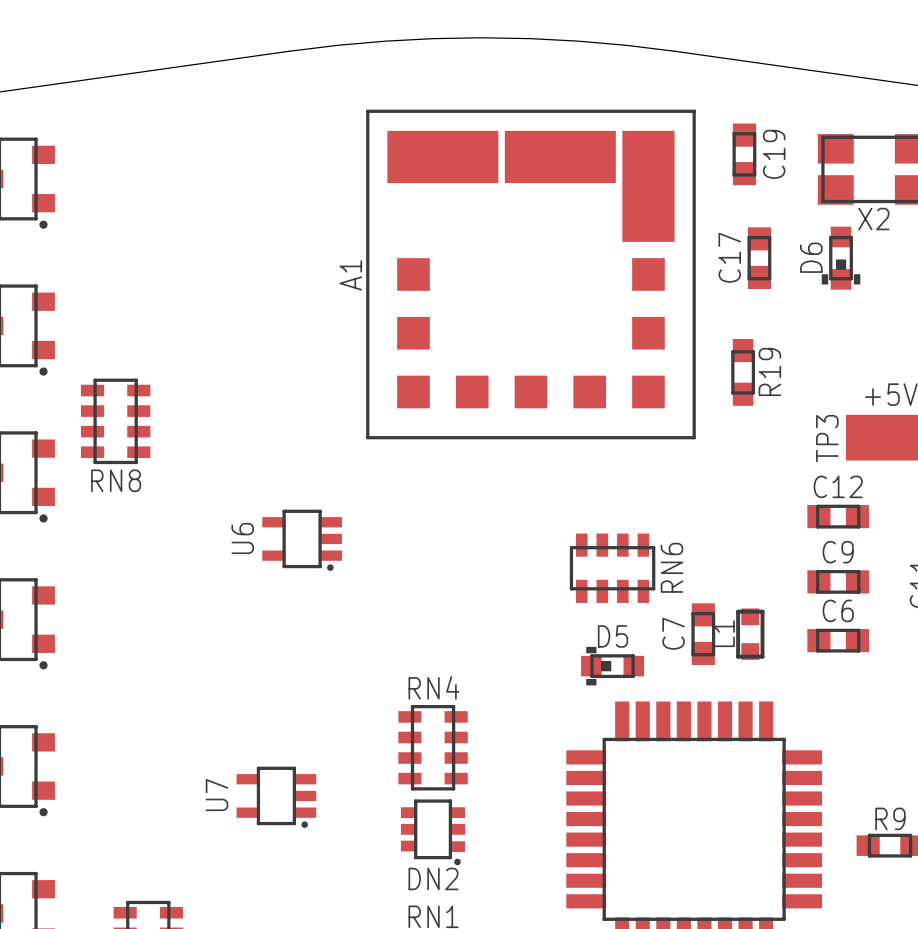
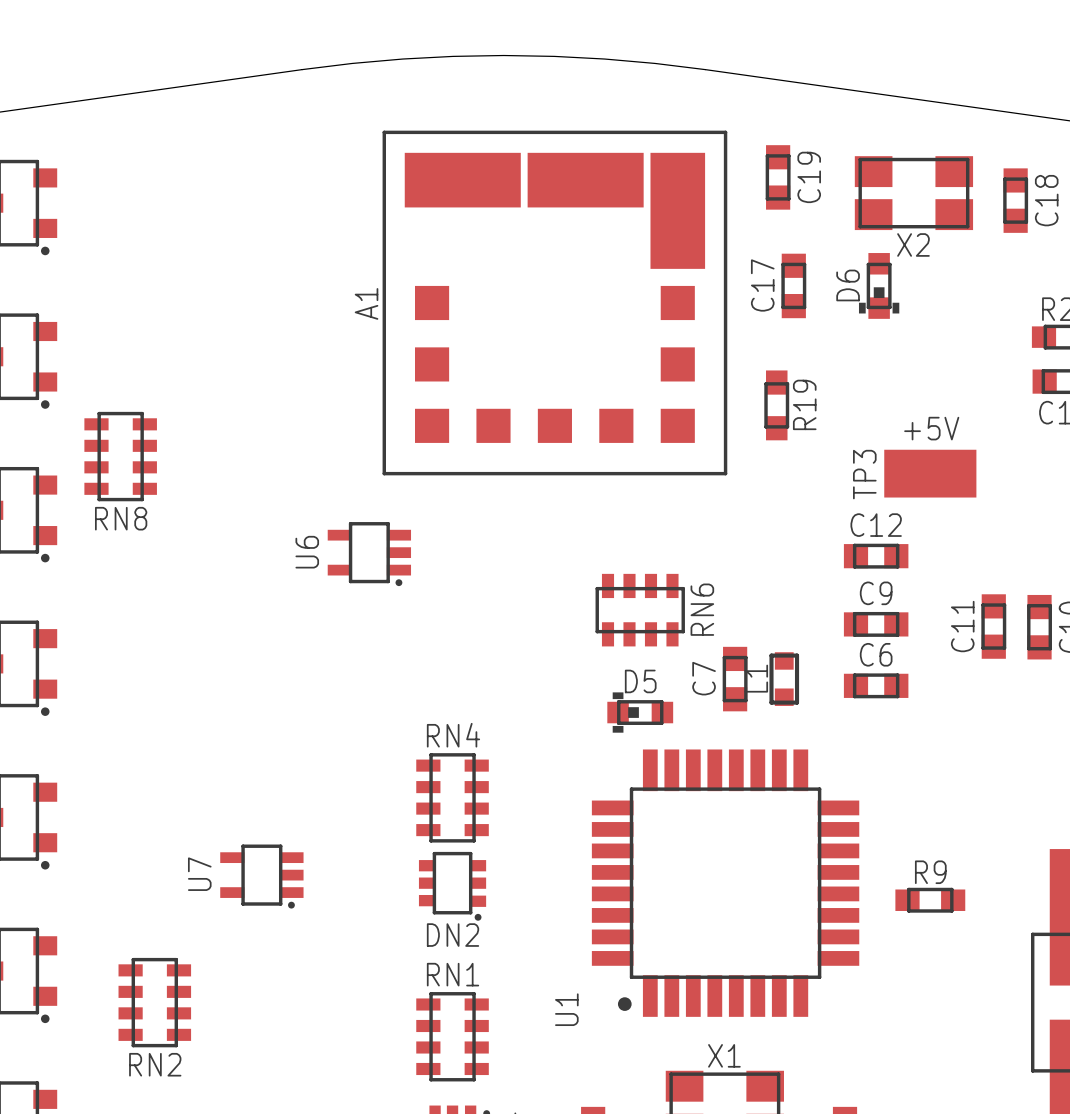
U6 position: (302, 540) -> (369, 554)
U7 position: (276, 797) -> (261, 876)

